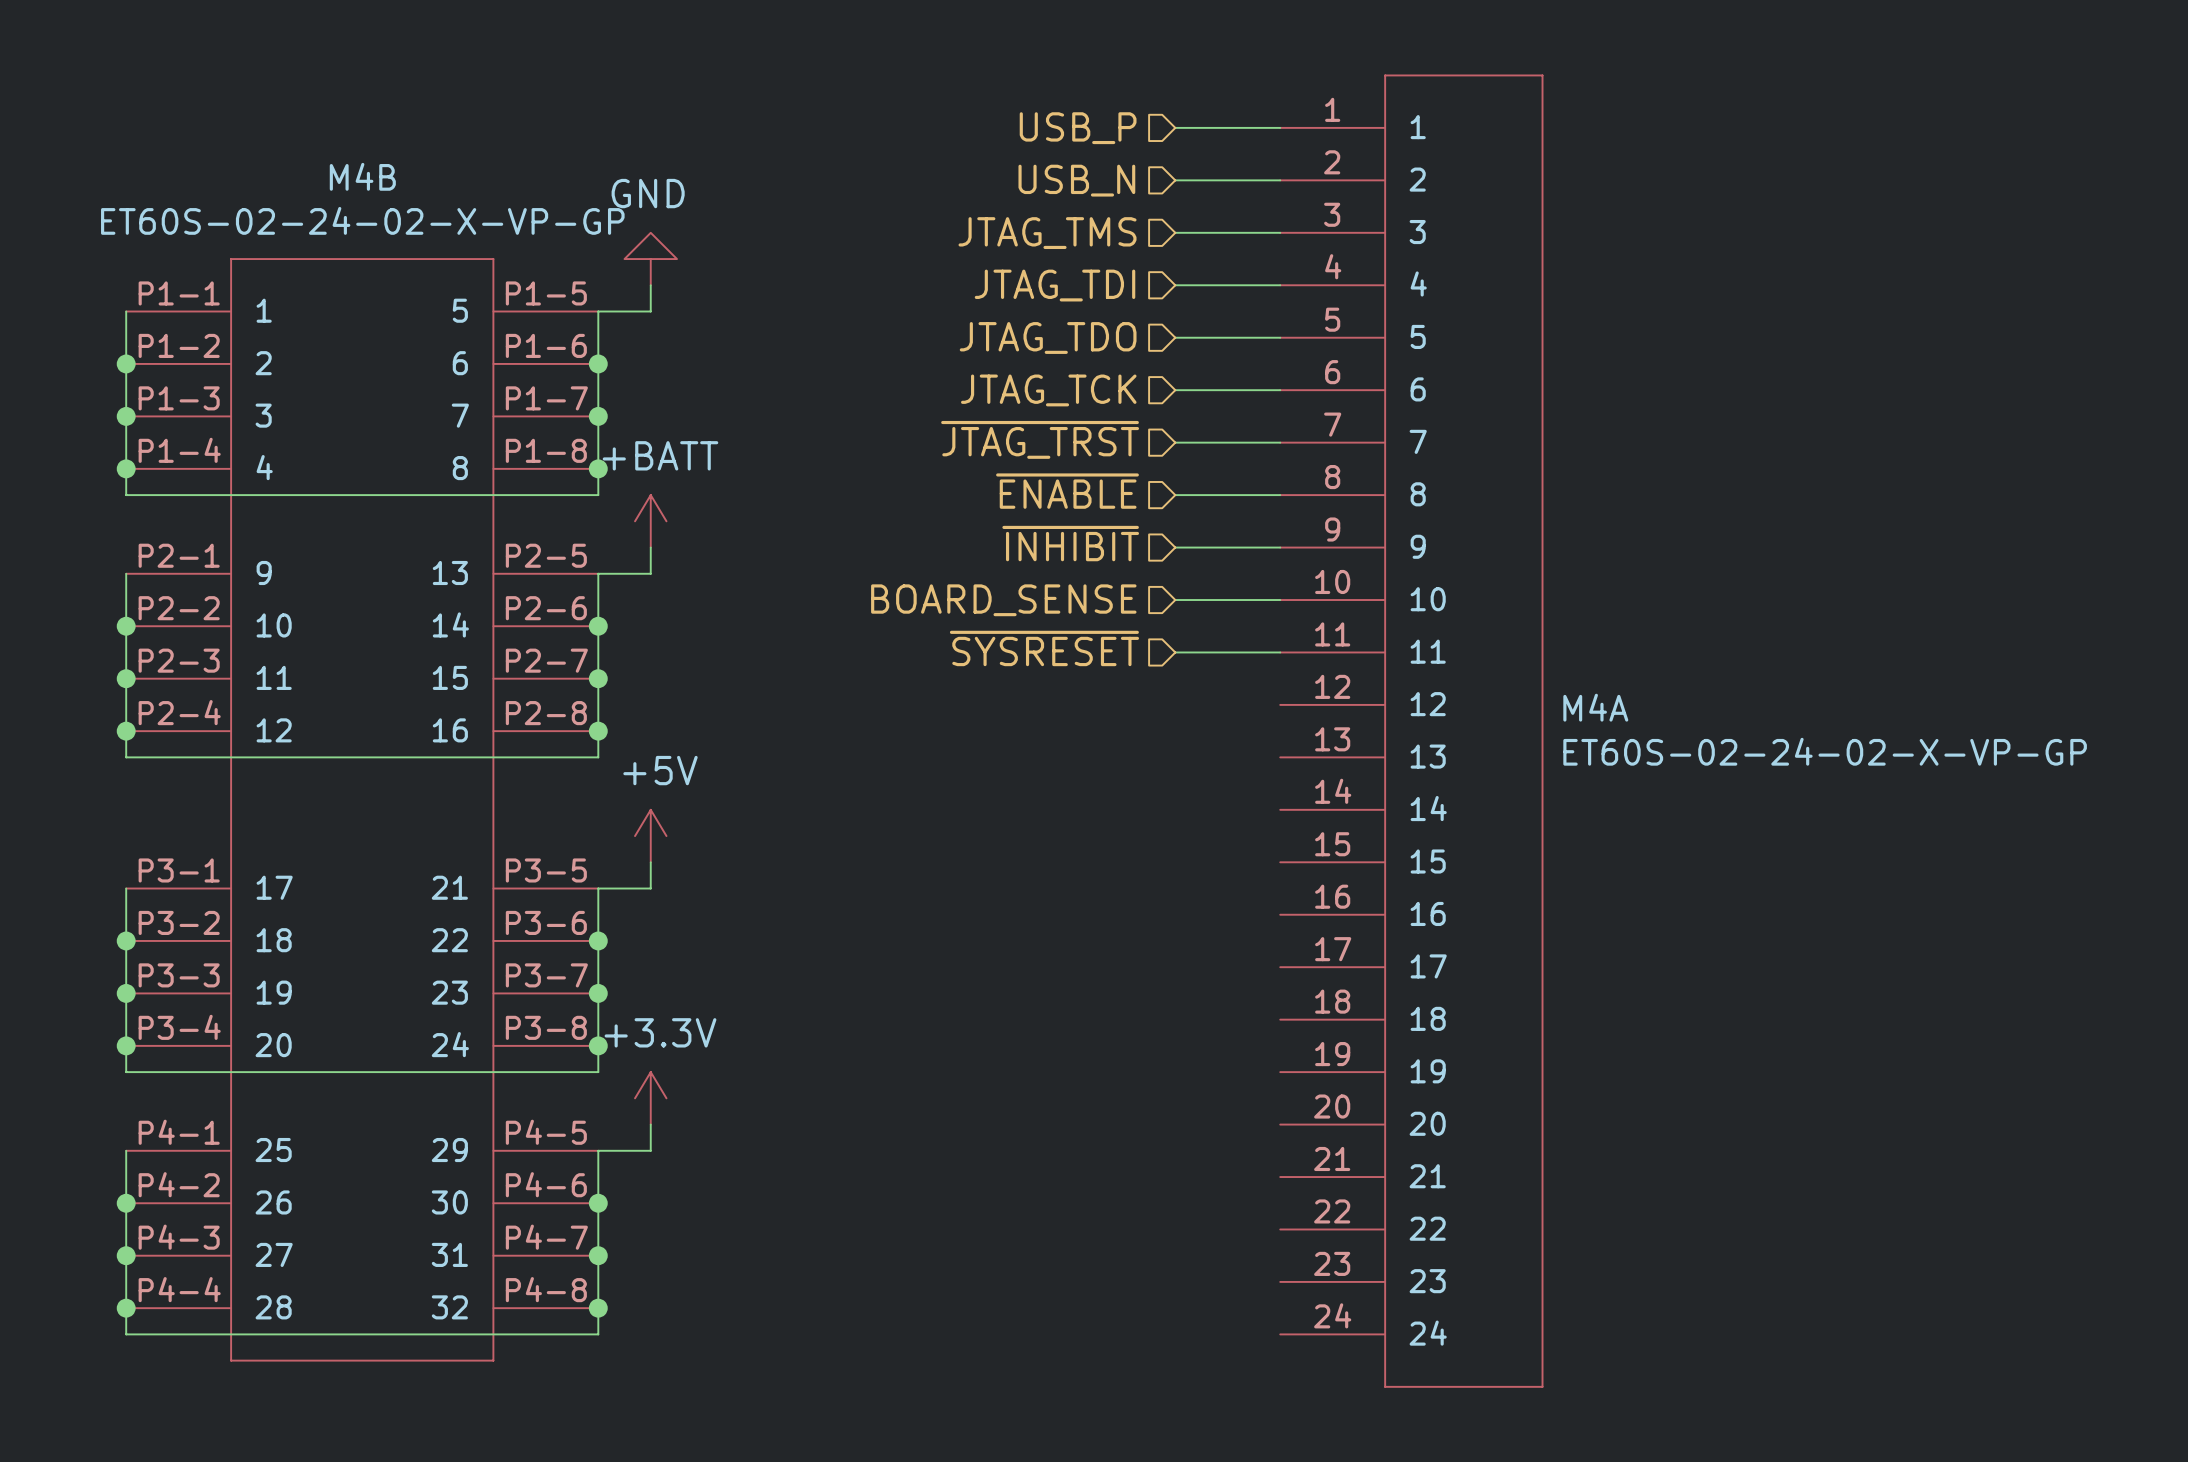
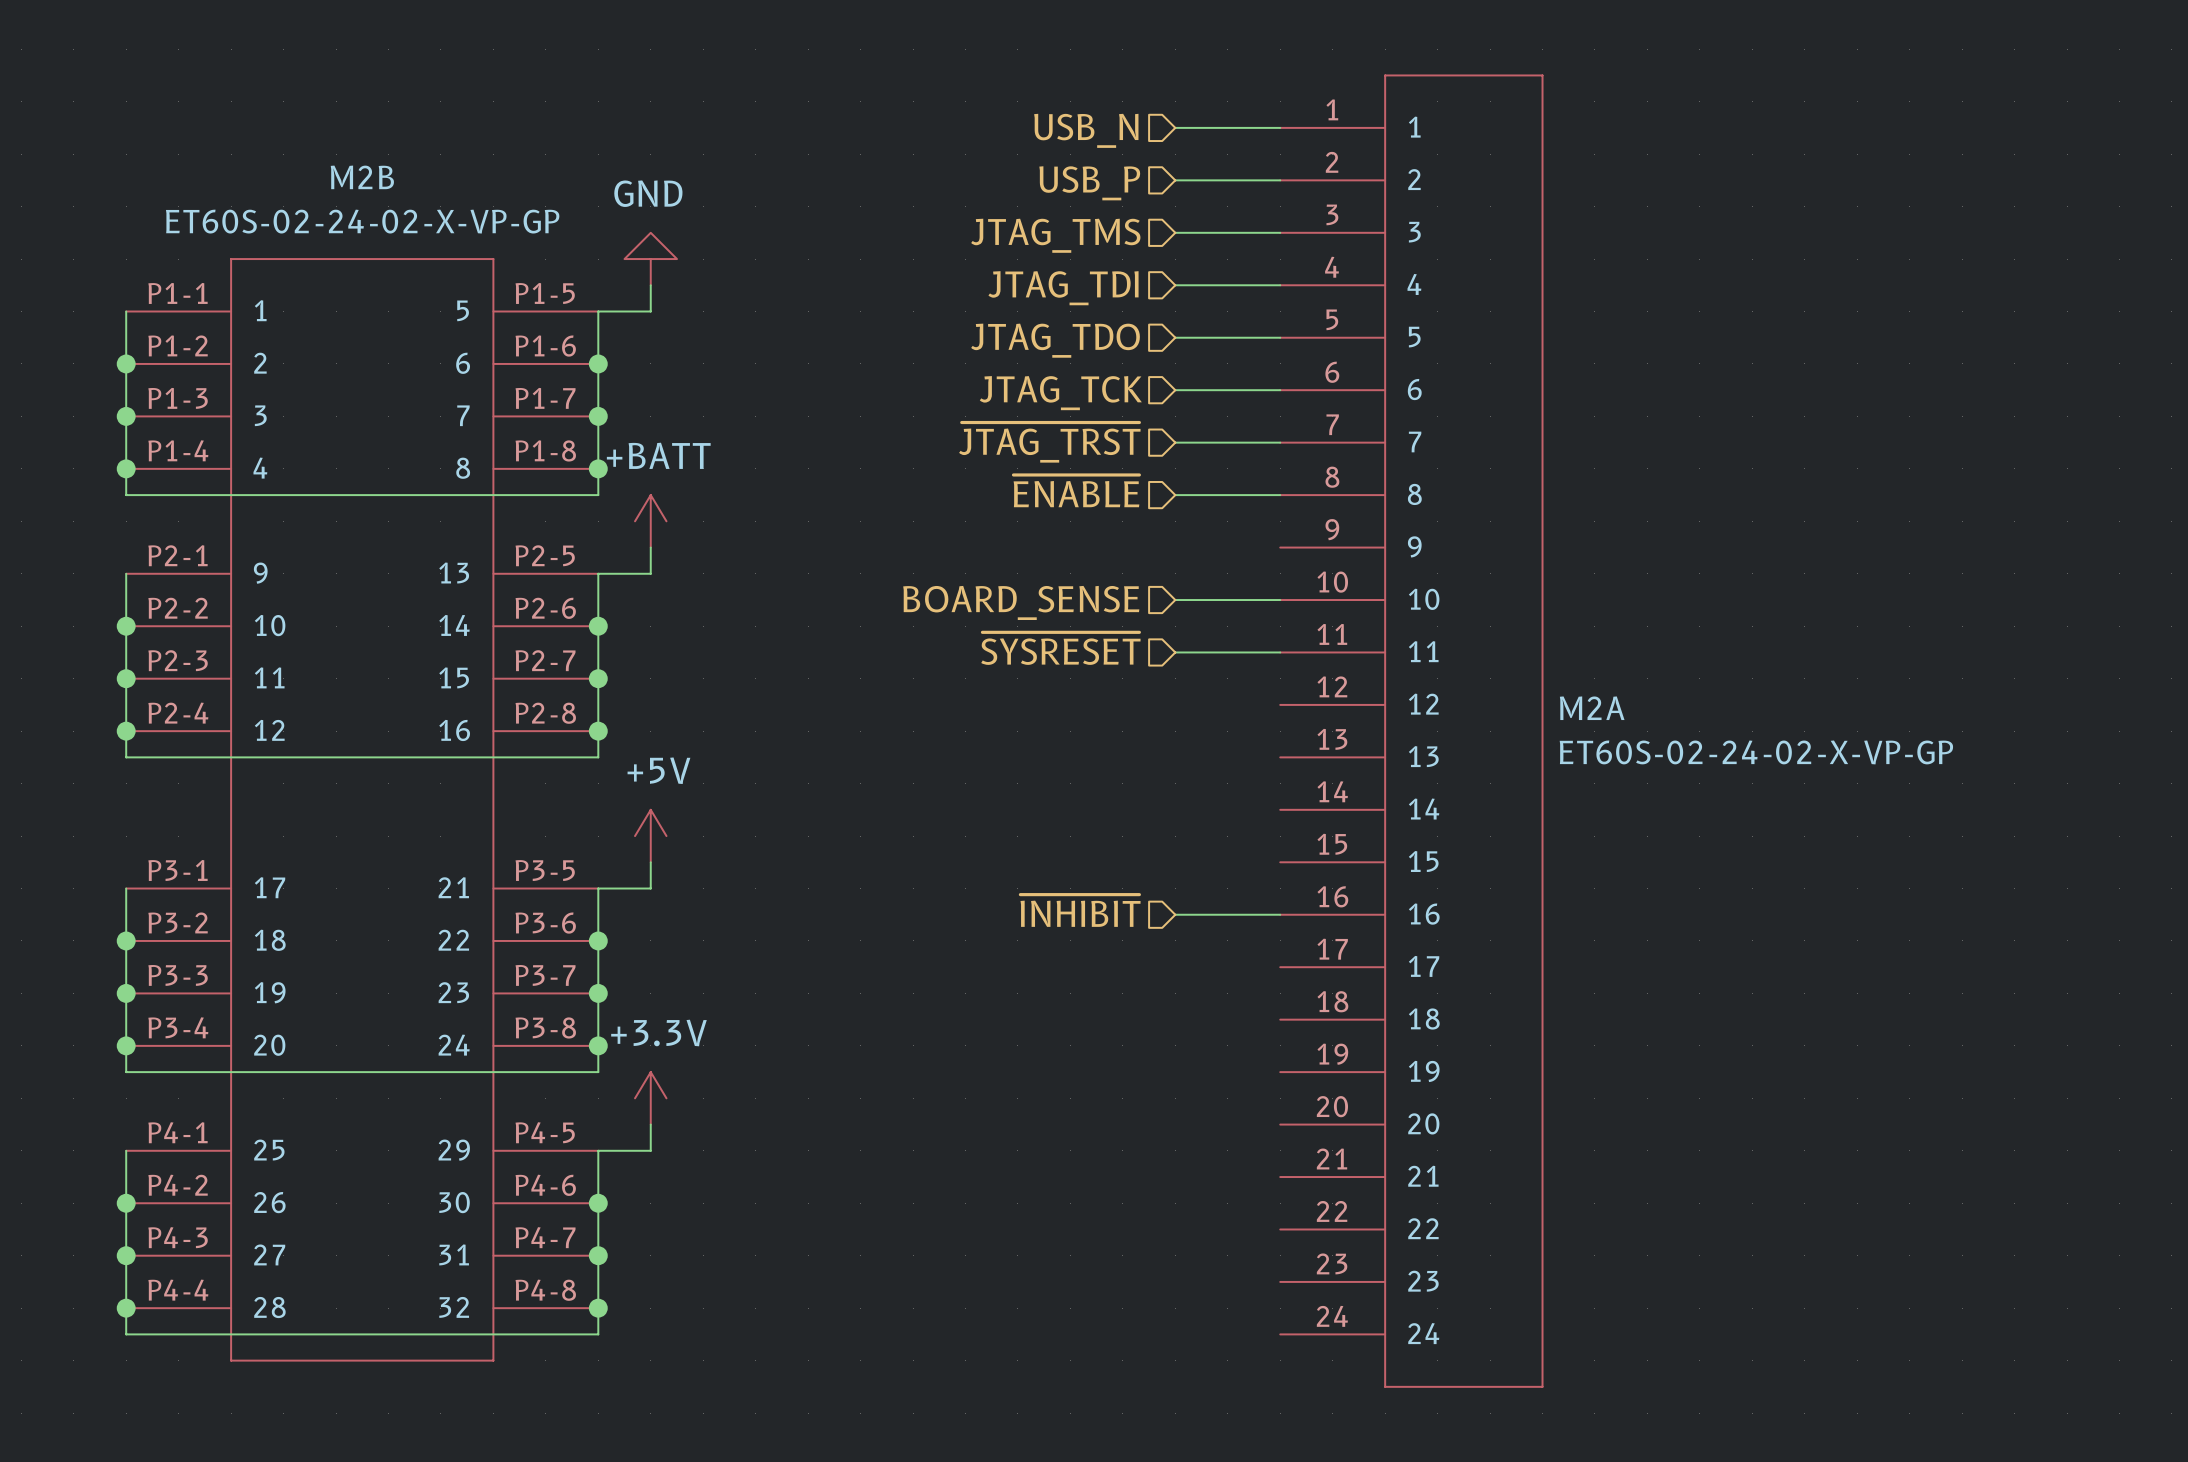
hierarchical label: USB_P (1078, 128) -> USB_N (1086, 130)
M4B name: M4B (362, 176) -> M2B (362, 177)
hierarchical label: USB_N (1076, 180) -> USB_P (1089, 183)
hierarchical label position: ~{INHIBIT} (1070, 543) -> ~{INHIBIT} (1080, 910)
wire: (1175, 547) (1280, 547) -> (1175, 914) (1280, 914)
M4A name: M4A (1595, 707) -> M2A (1592, 708)

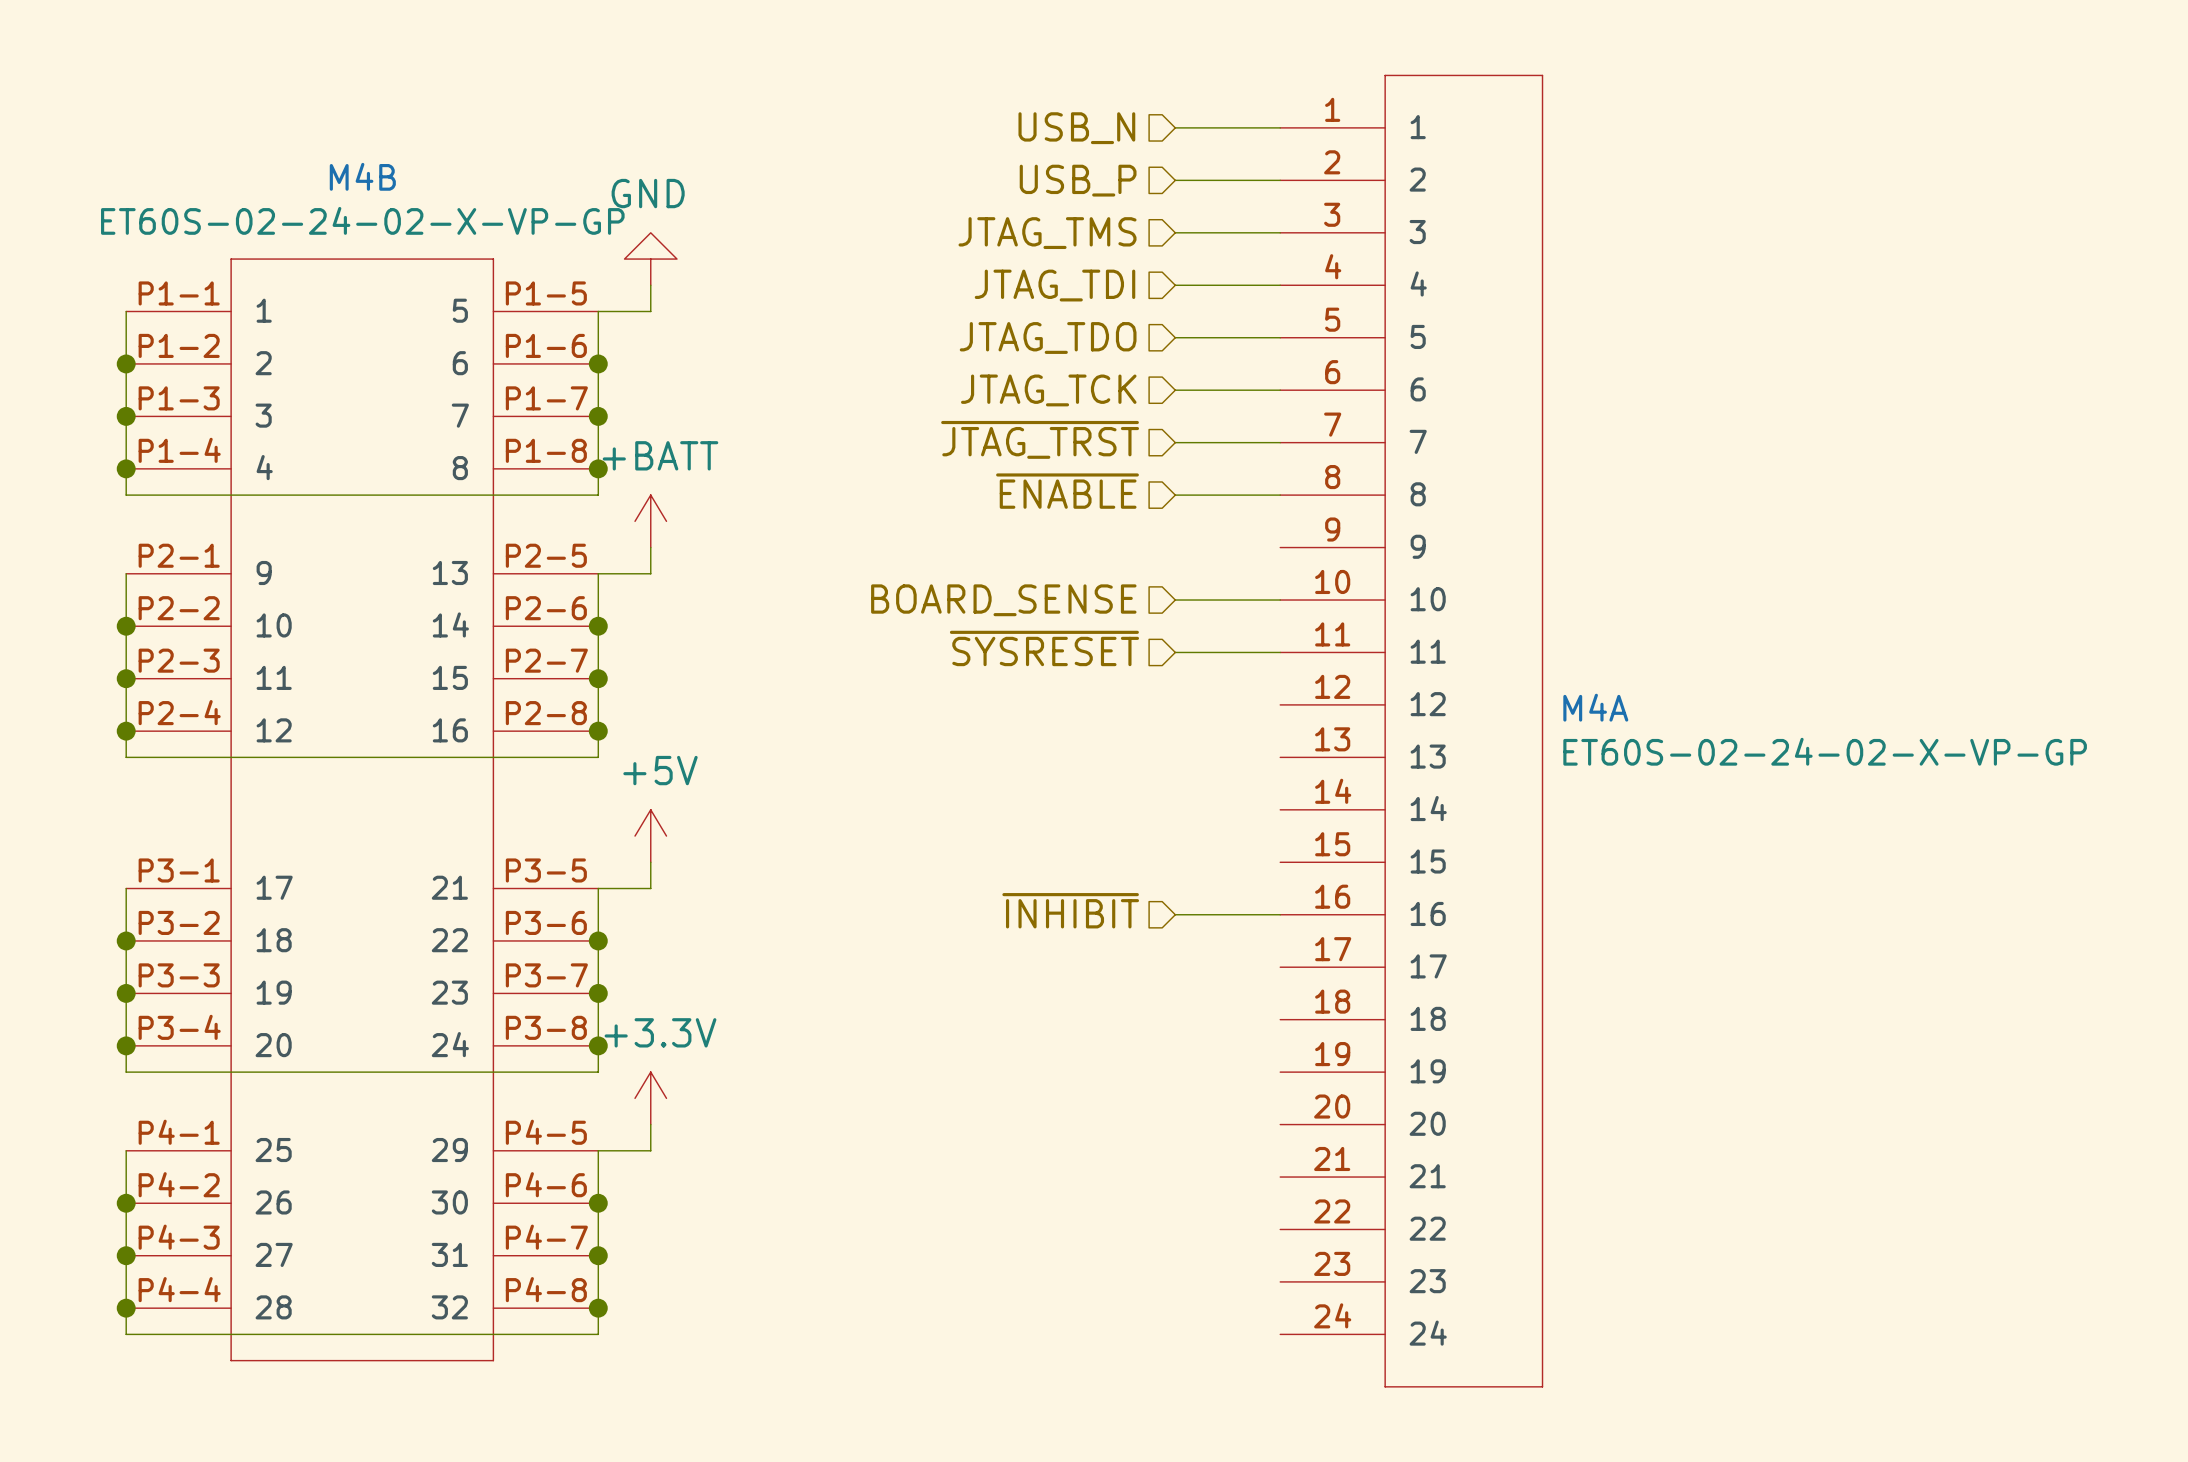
M2B name: M2B (362, 177) -> M4B (362, 176)
M2A name: M2A (1592, 708) -> M4A (1595, 707)

